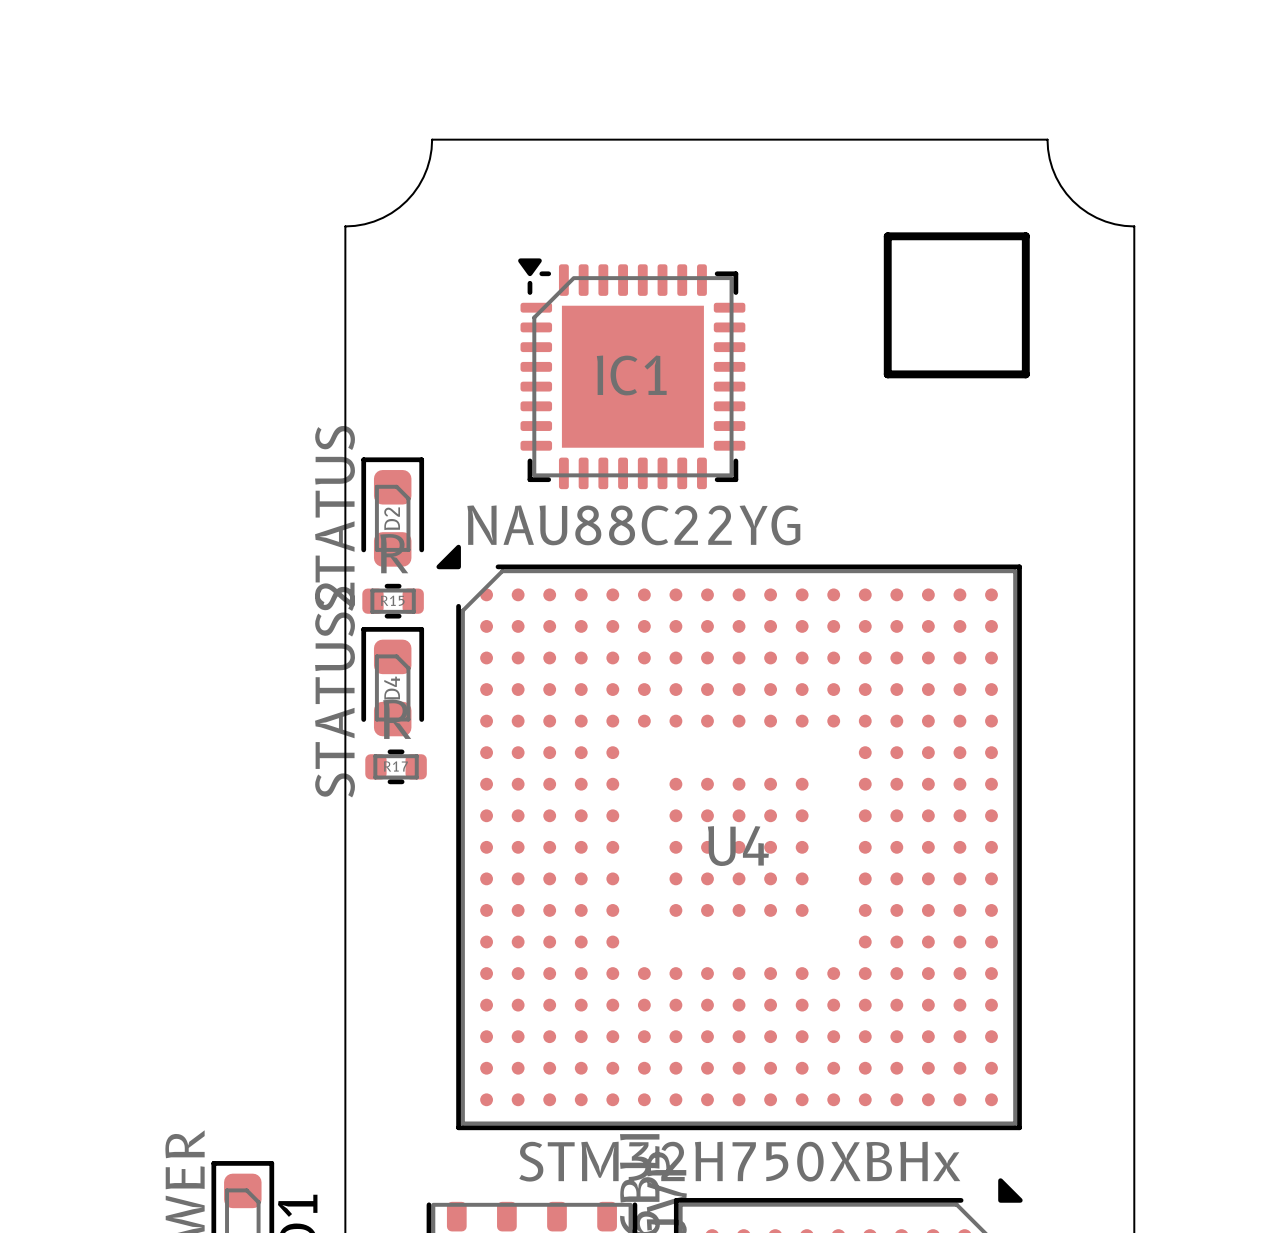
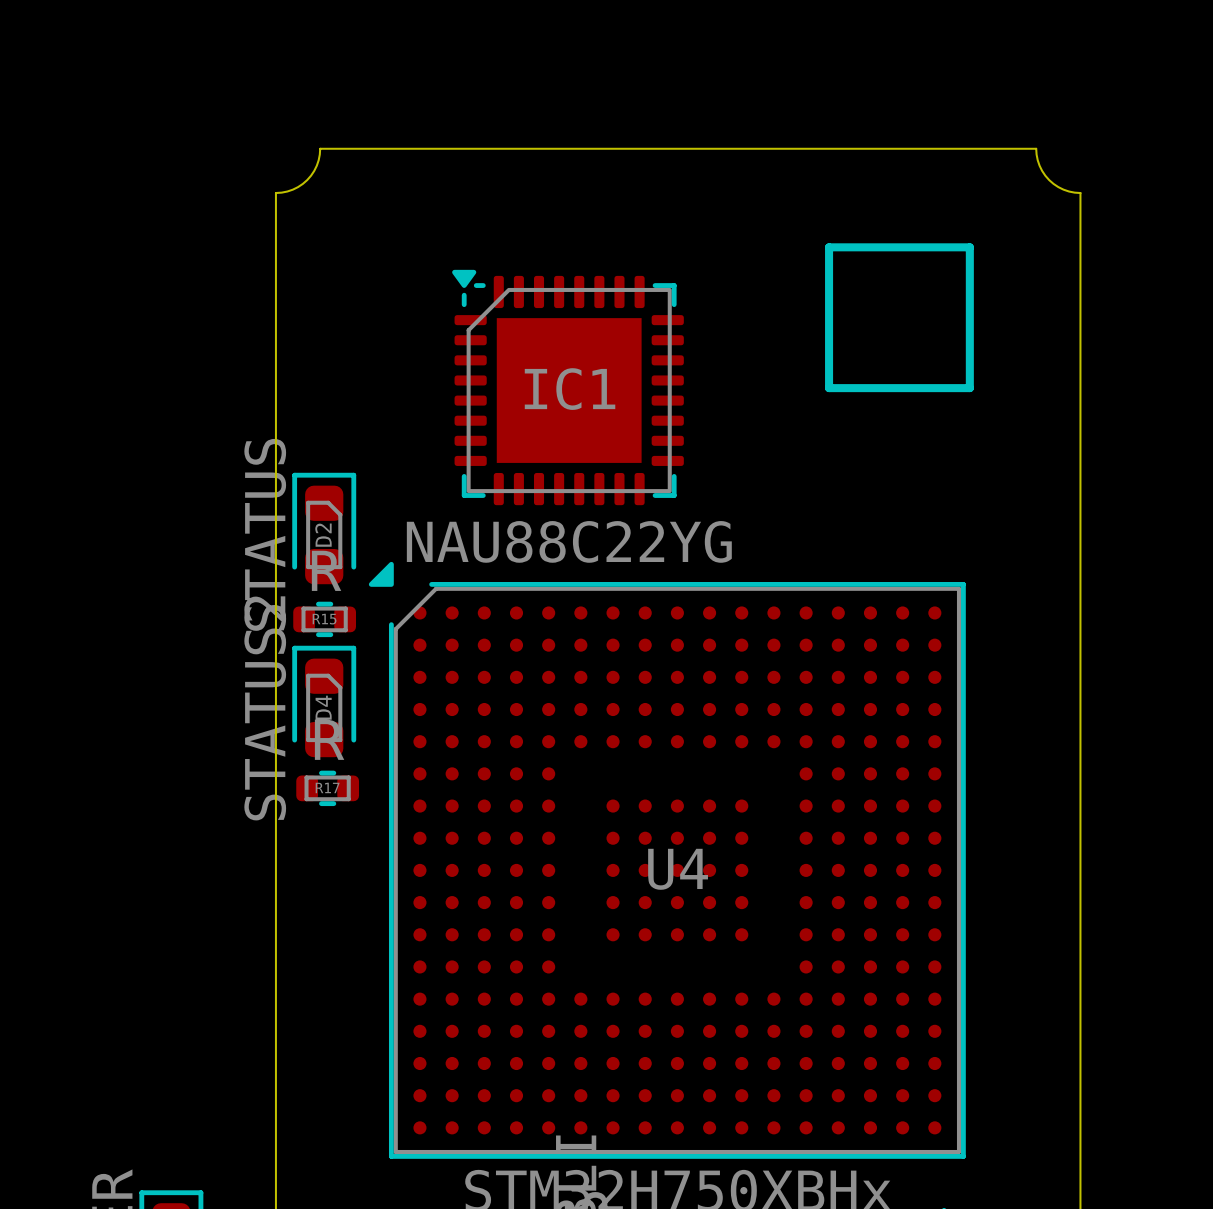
board edge: (432, 139) (427, 168) (418, 185) (406, 201) (391, 213) (374, 221) (345, 226) -> (364, 148) (320, 148) (316, 165) (307, 180) (292, 189) (275, 193) (275, 237)
board edge: (1047, 139) (1049, 158) (1056, 177) (1072, 201) (1096, 217) (1114, 224) (1134, 226) -> (991, 148) (1036, 148) (1039, 165) (1049, 180) (1063, 189) (1080, 193) (1080, 237)

